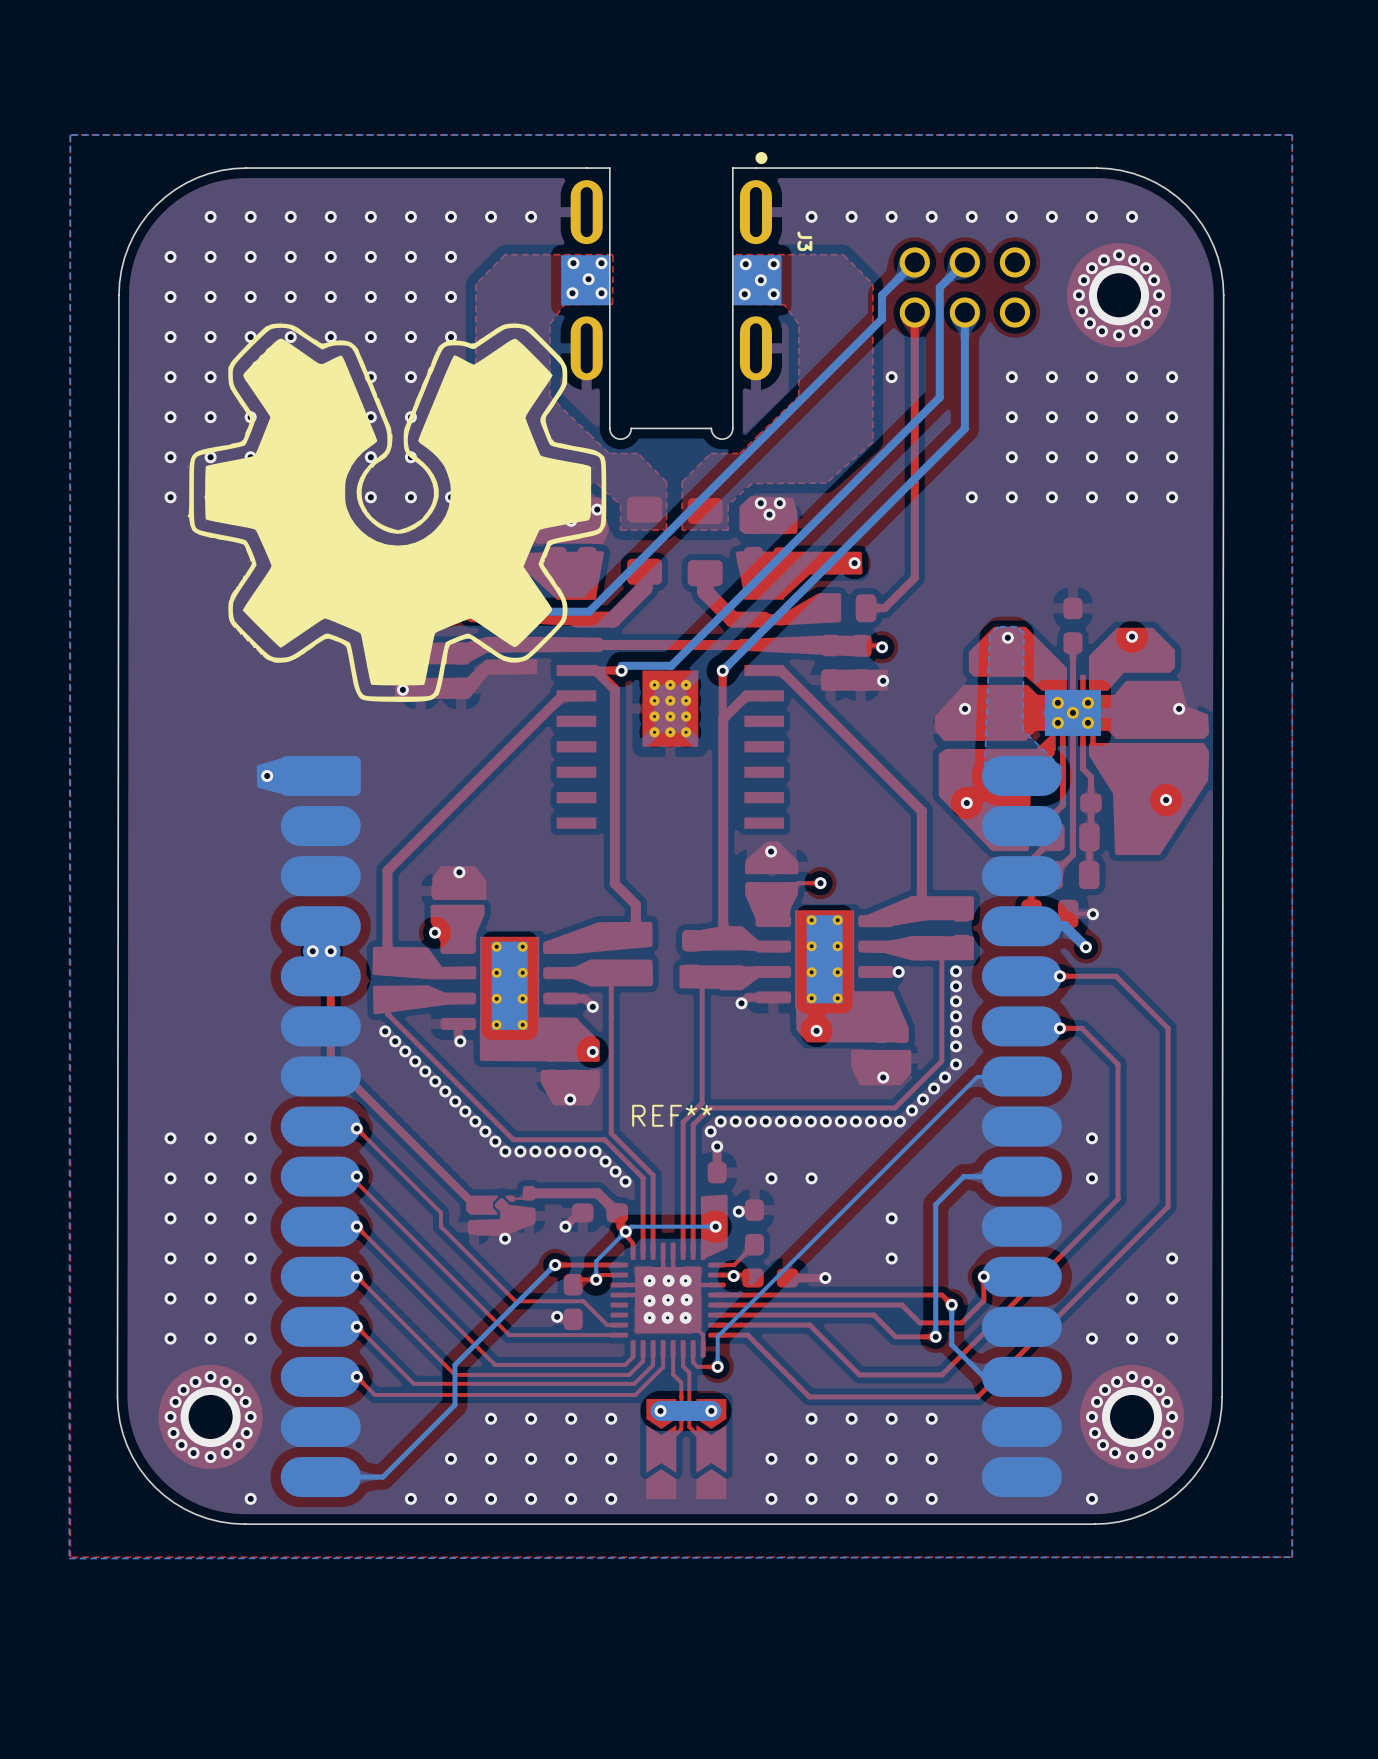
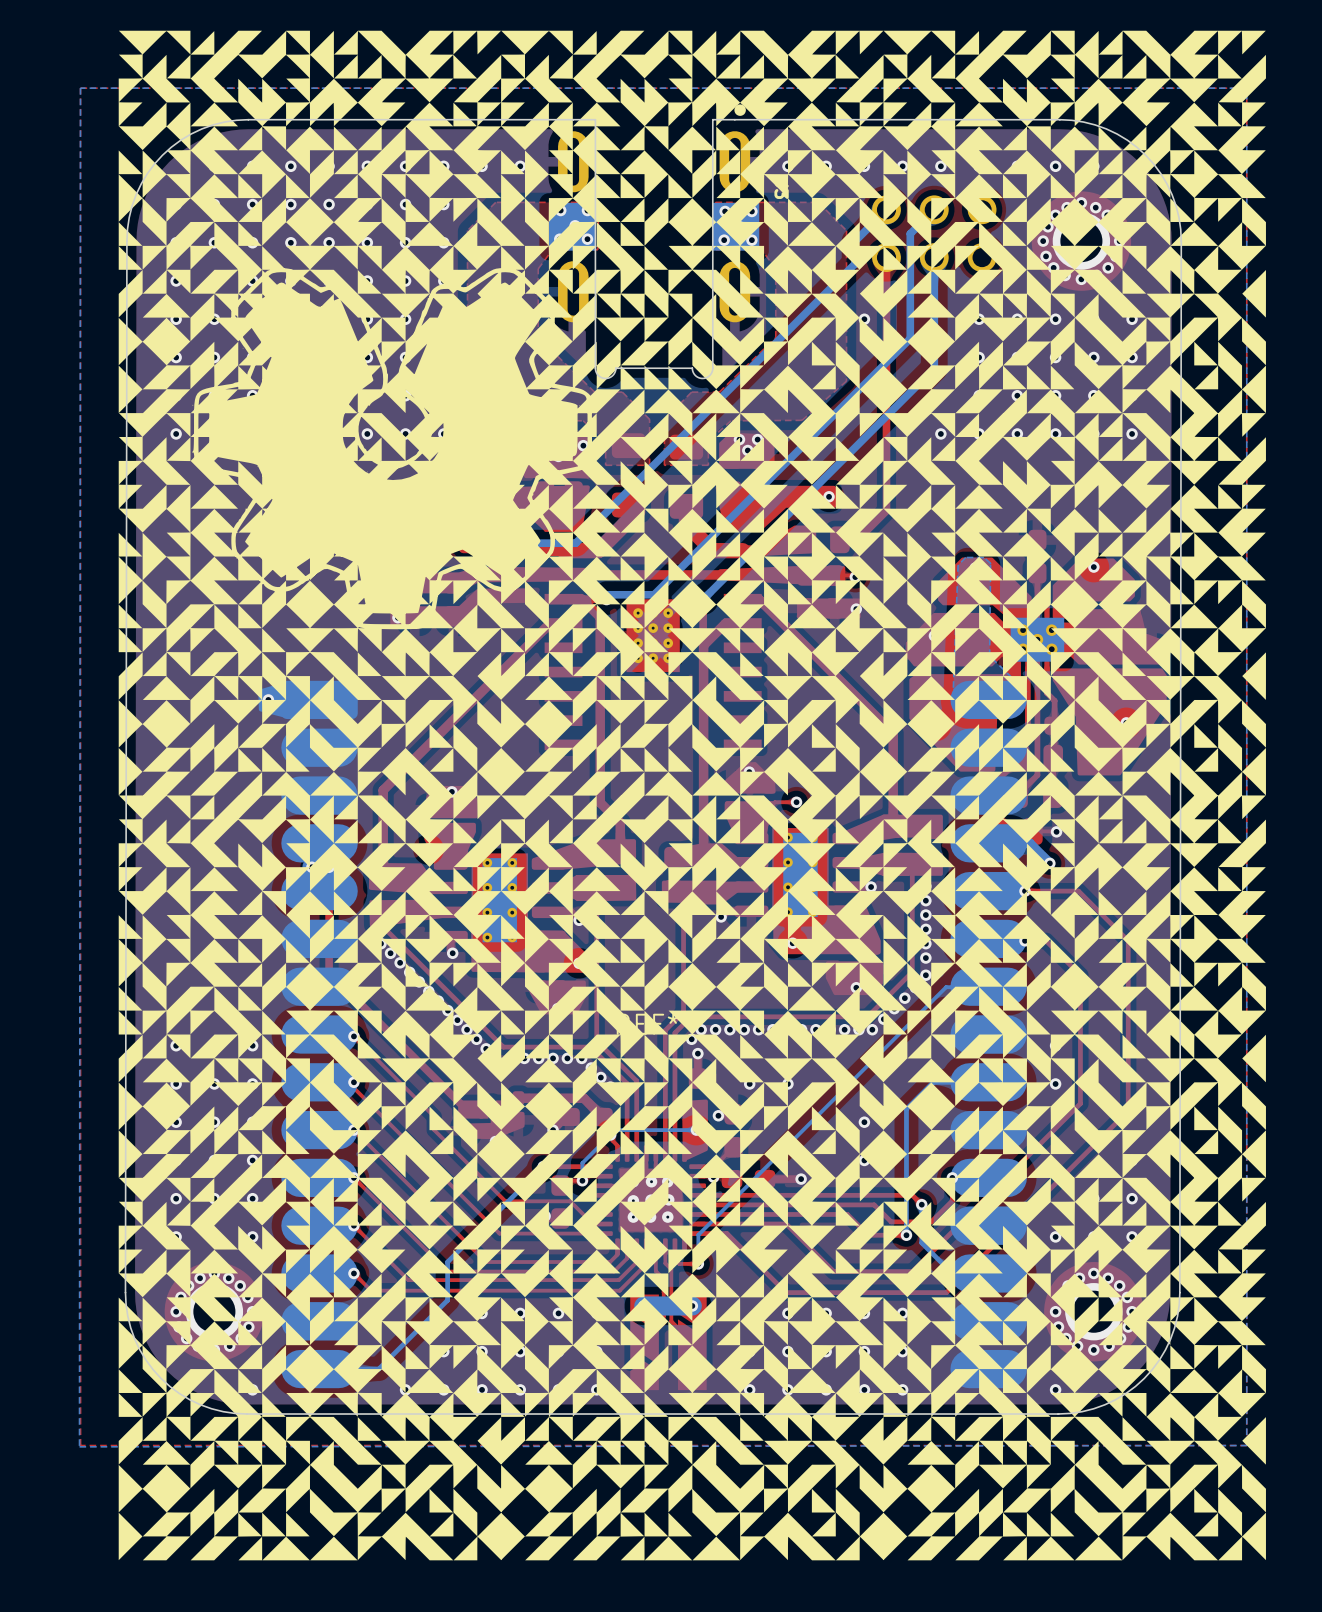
drawing: none -> [118, 30, 1266, 1561]

